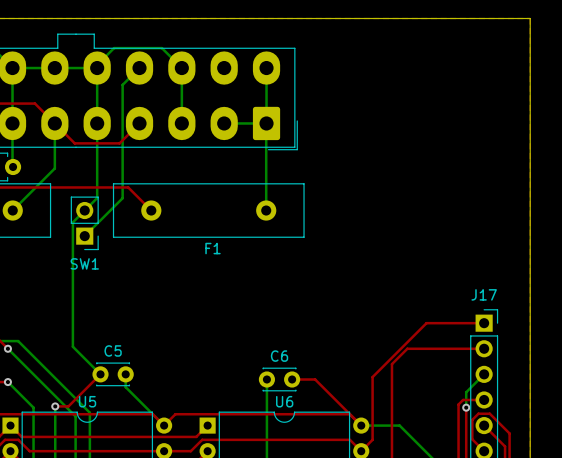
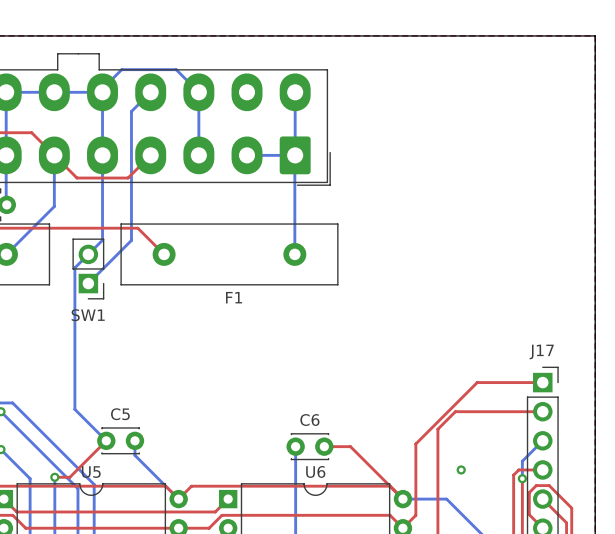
via: none -> (461, 469)

